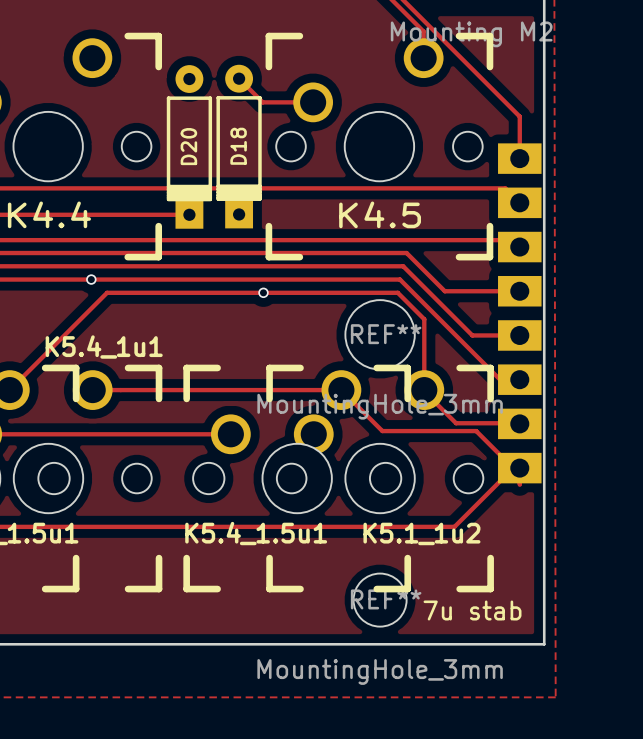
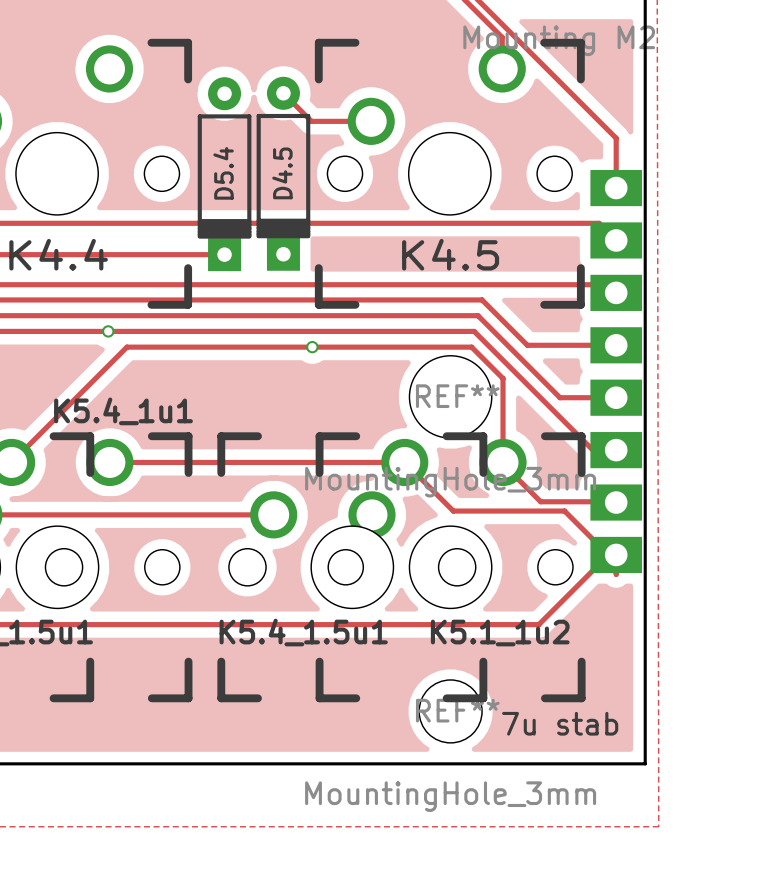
D20 name: D20 (188, 146) -> D5.4 (223, 173)
D18 name: D18 (238, 146) -> D4.5 (282, 173)

